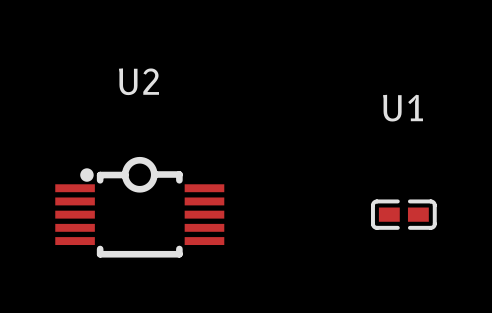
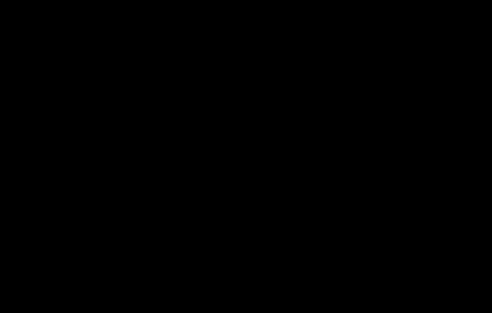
U2: (139, 207) -> none
U1: (403, 214) -> none

